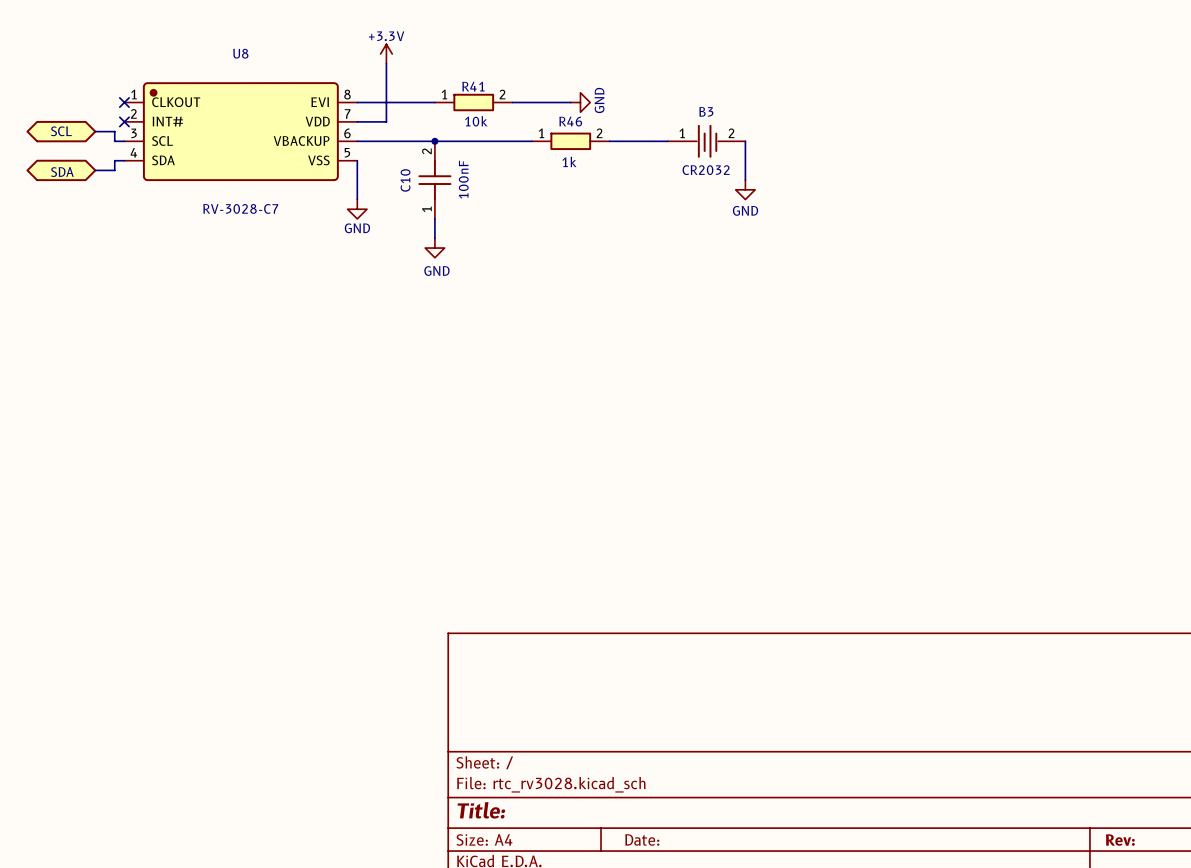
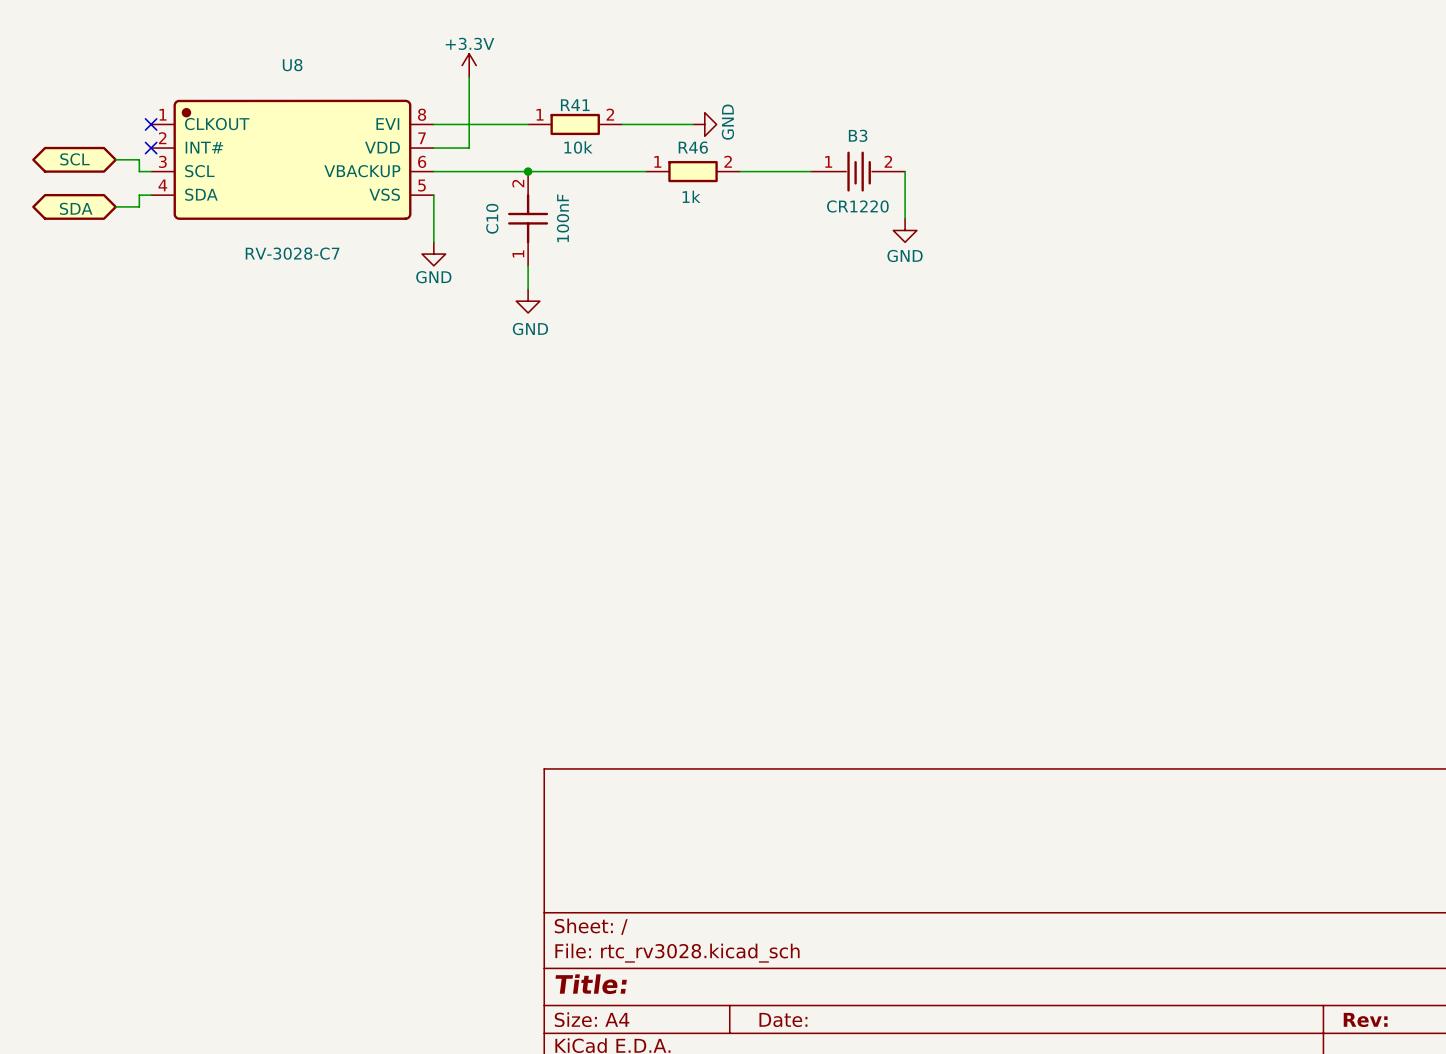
B3 value: CR2032 (706, 170) -> CR1220 (857, 206)

